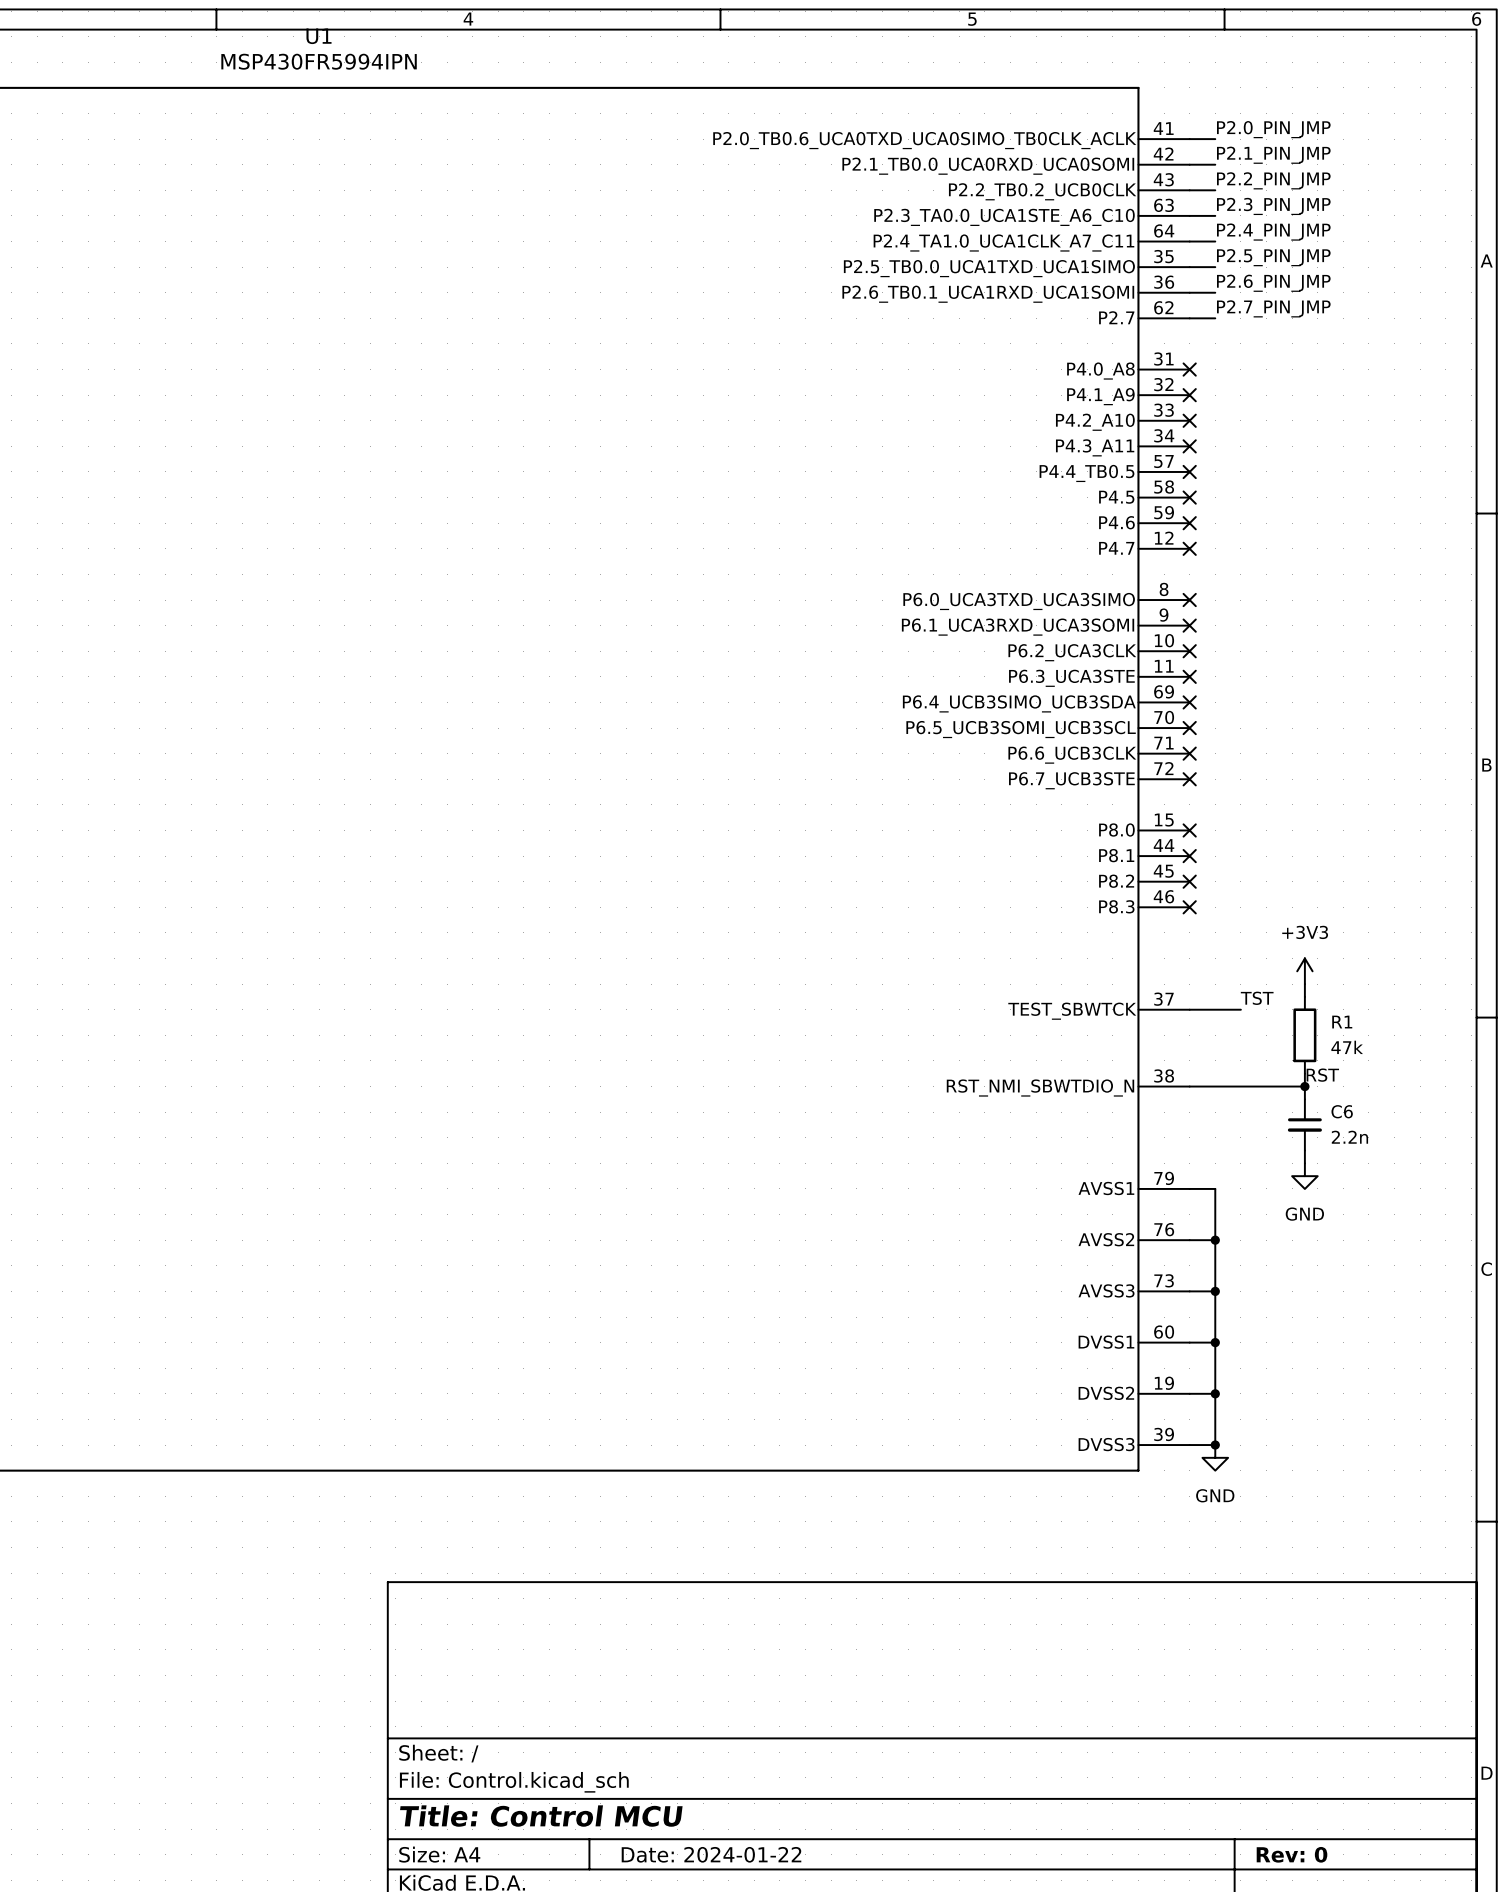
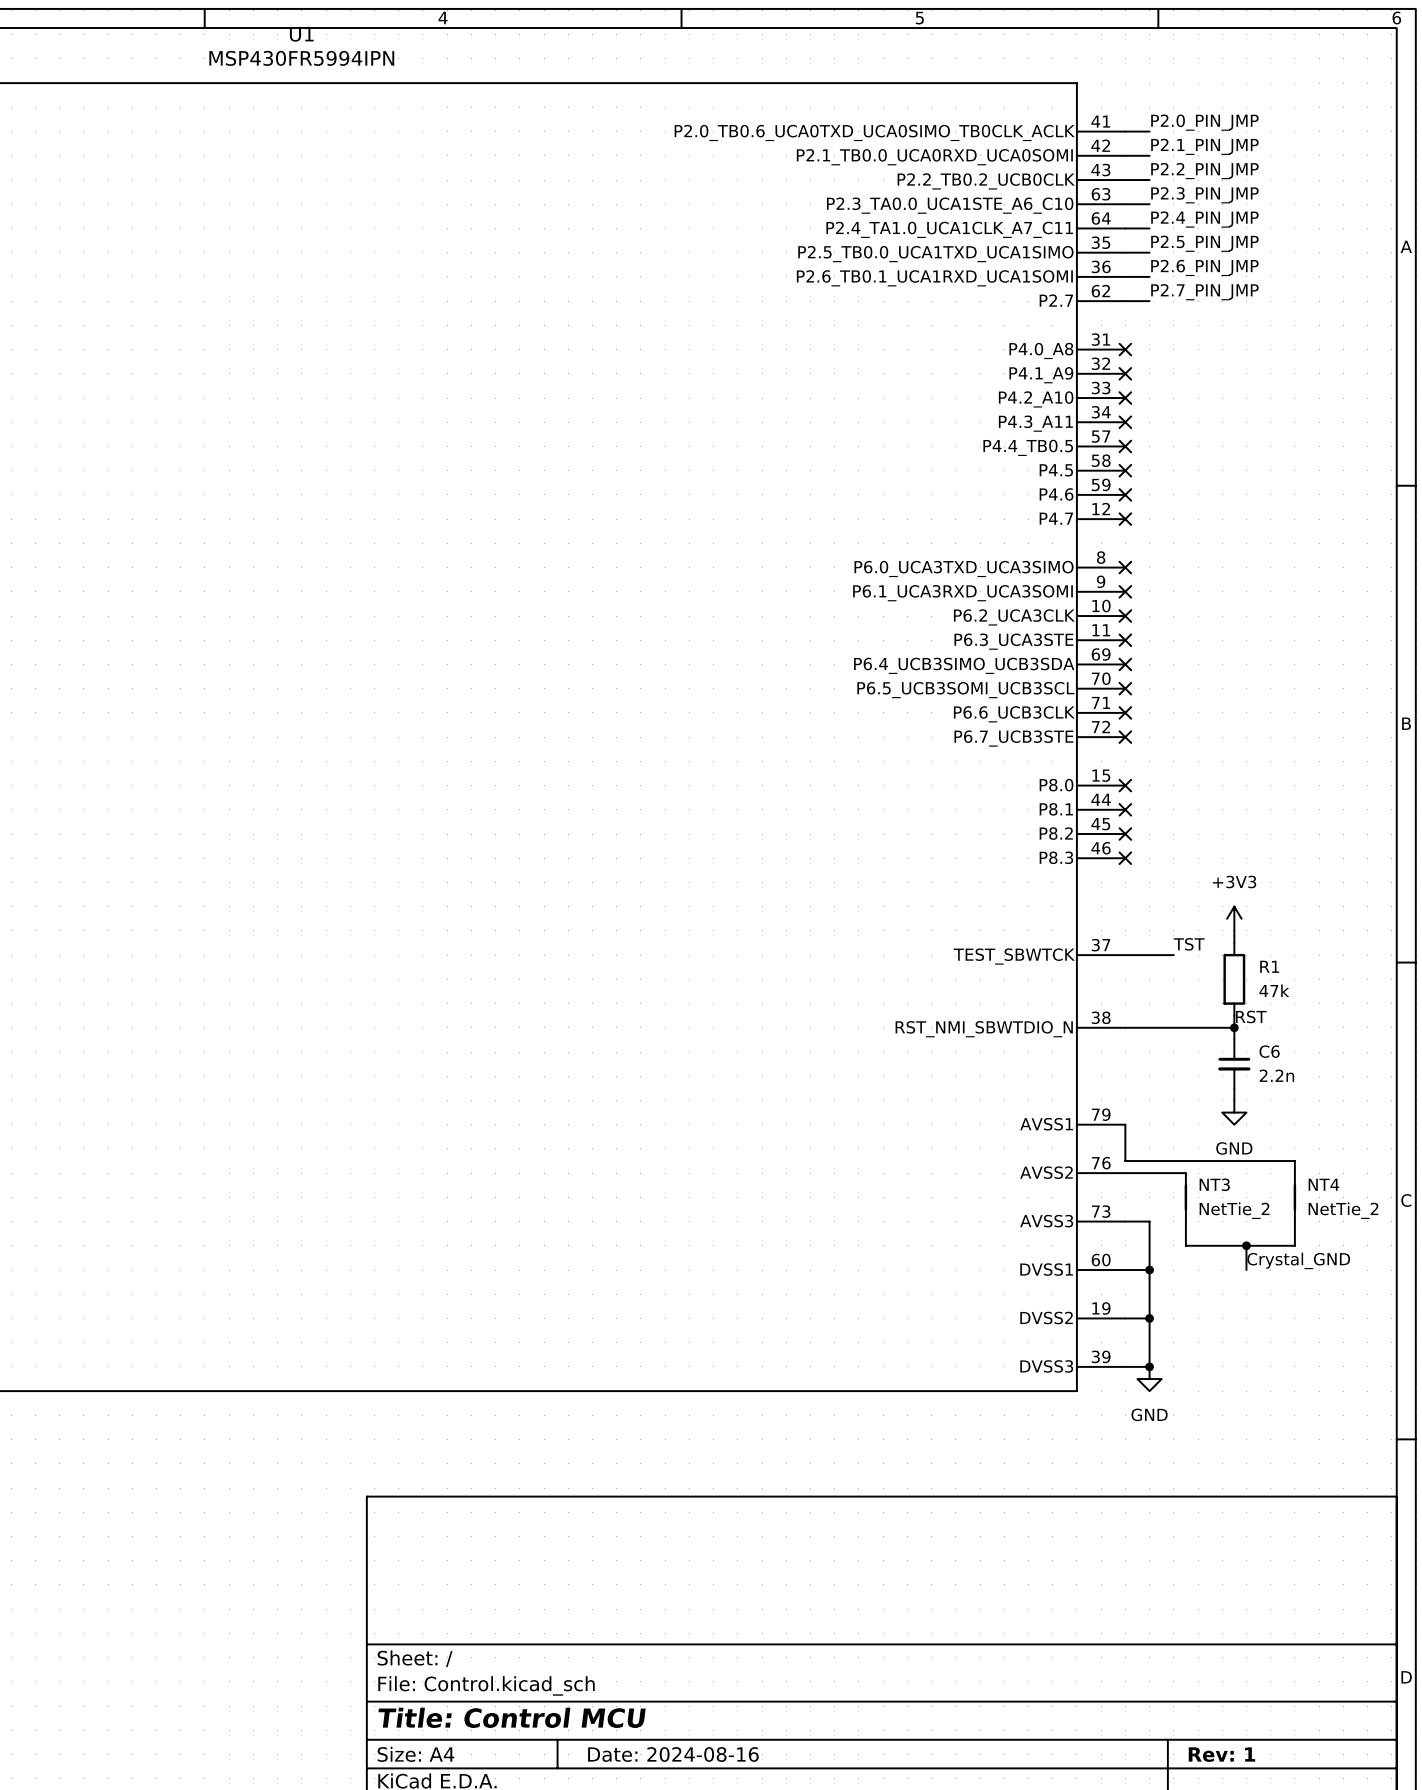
wire: (1189, 1188) (1215, 1188) (1215, 1291) -> (1125, 1124) (1125, 1161) (1294, 1161) (1294, 1173)
wire: none -> (1149, 1173) (1185, 1173)
junction: (1215, 1240) -> none
NT3: none -> NetTie_2 (1185, 1197)
NT4: none -> NetTie_2 (1294, 1197)
junction: (1215, 1291) -> none
wire: none -> (1185, 1221) (1185, 1245) (1294, 1245) (1294, 1221)
wire: none -> (1246, 1245) (1246, 1270)
junction: none -> (1246, 1245)
label: none -> Crystal_GND (1298, 1260)
title block: Date: 2024-01-22 (711, 1854) -> Date: 2024-08-16 (673, 1754)
title block: Rev: 0 (1292, 1854) -> Rev: 1 (1221, 1754)

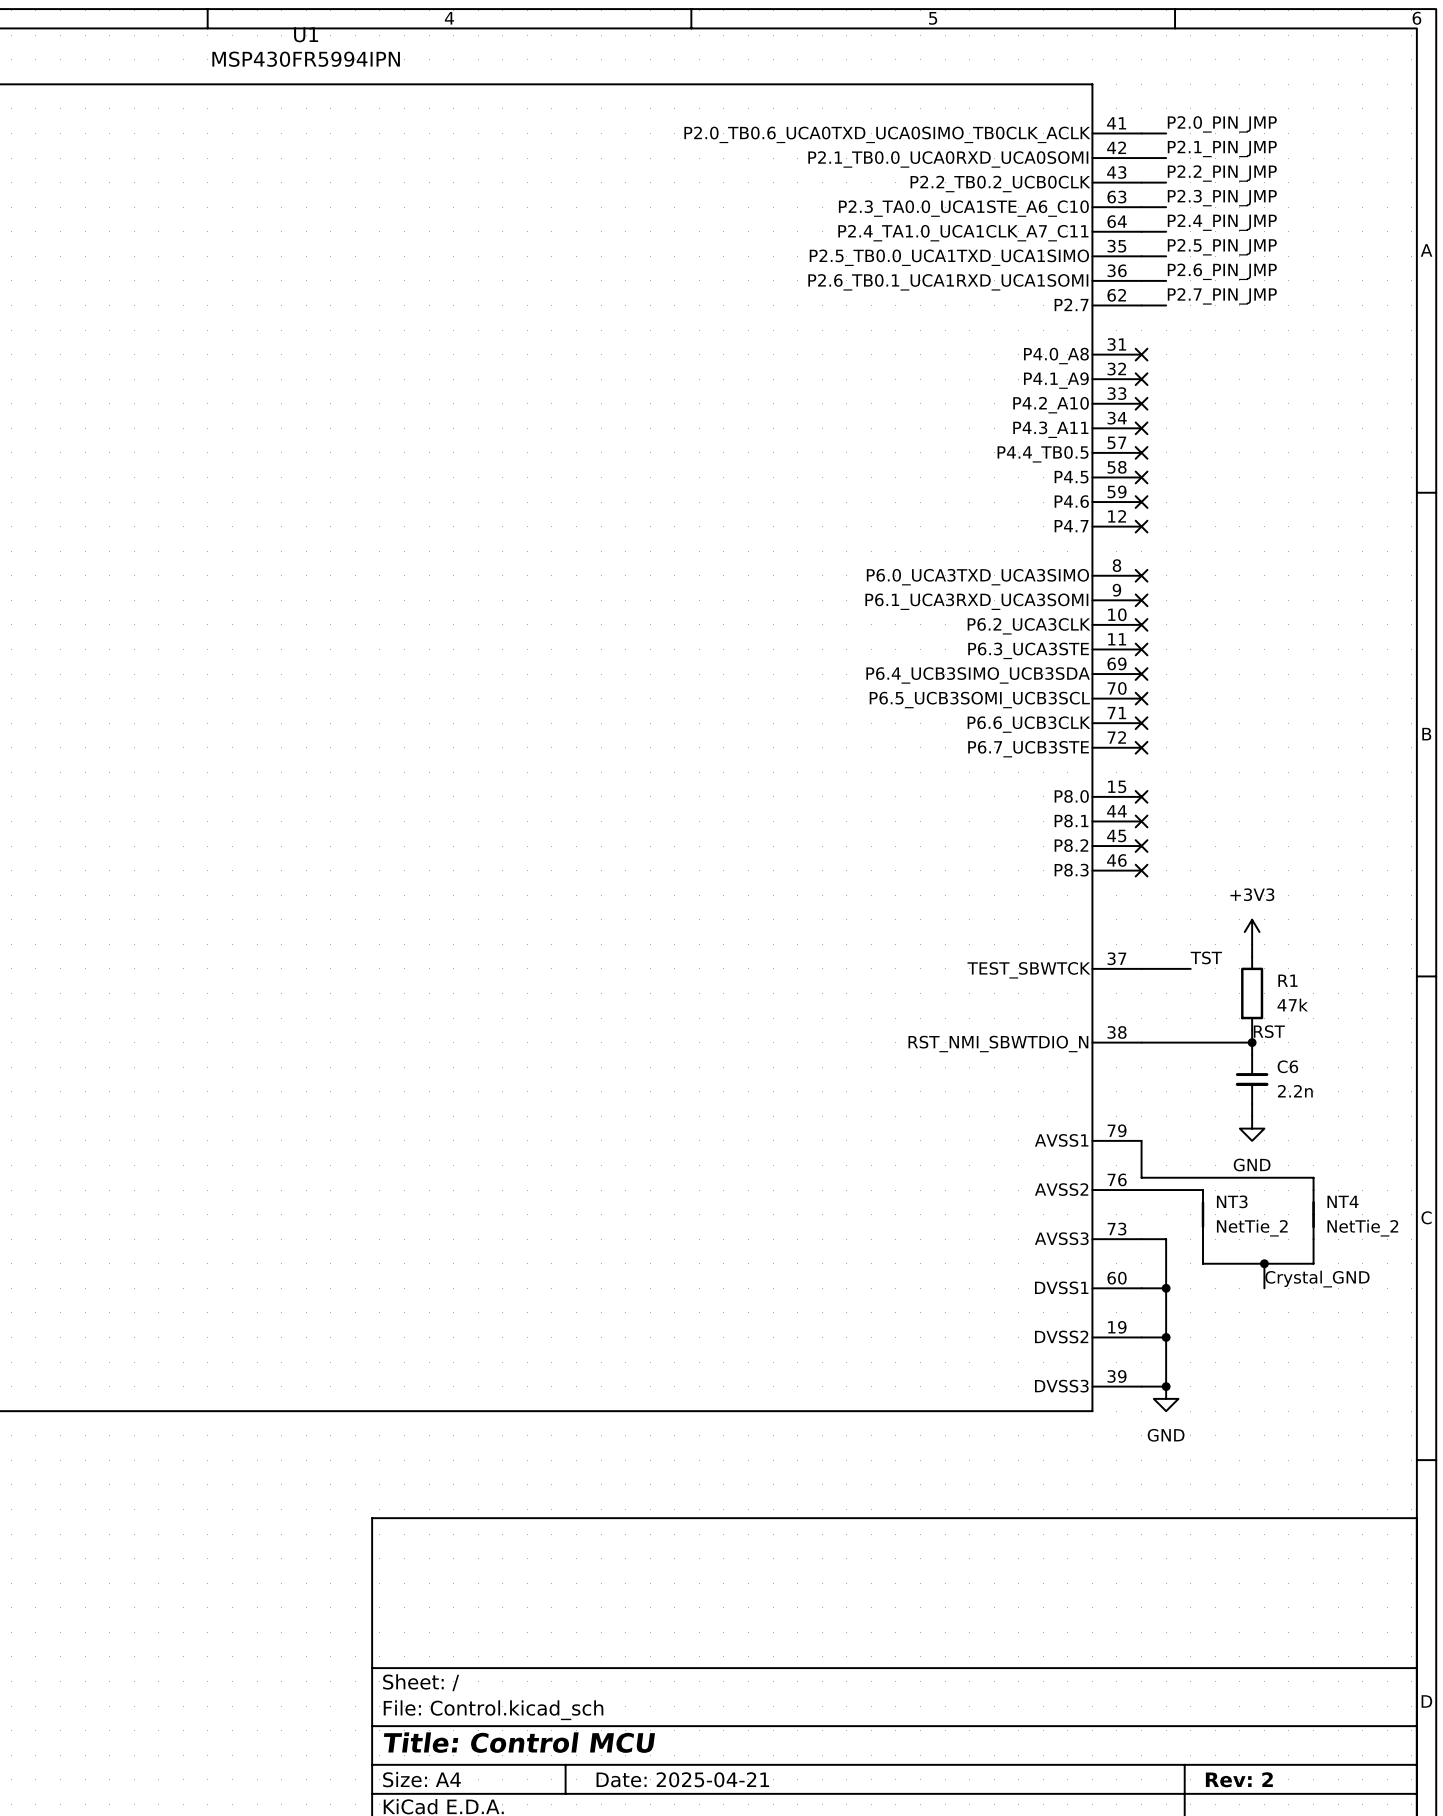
title block: Date: 2024-08-16 (673, 1754) -> Date: 2025-04-21 (682, 1779)
title block: Rev: 1 (1221, 1754) -> Rev: 2 (1239, 1779)

